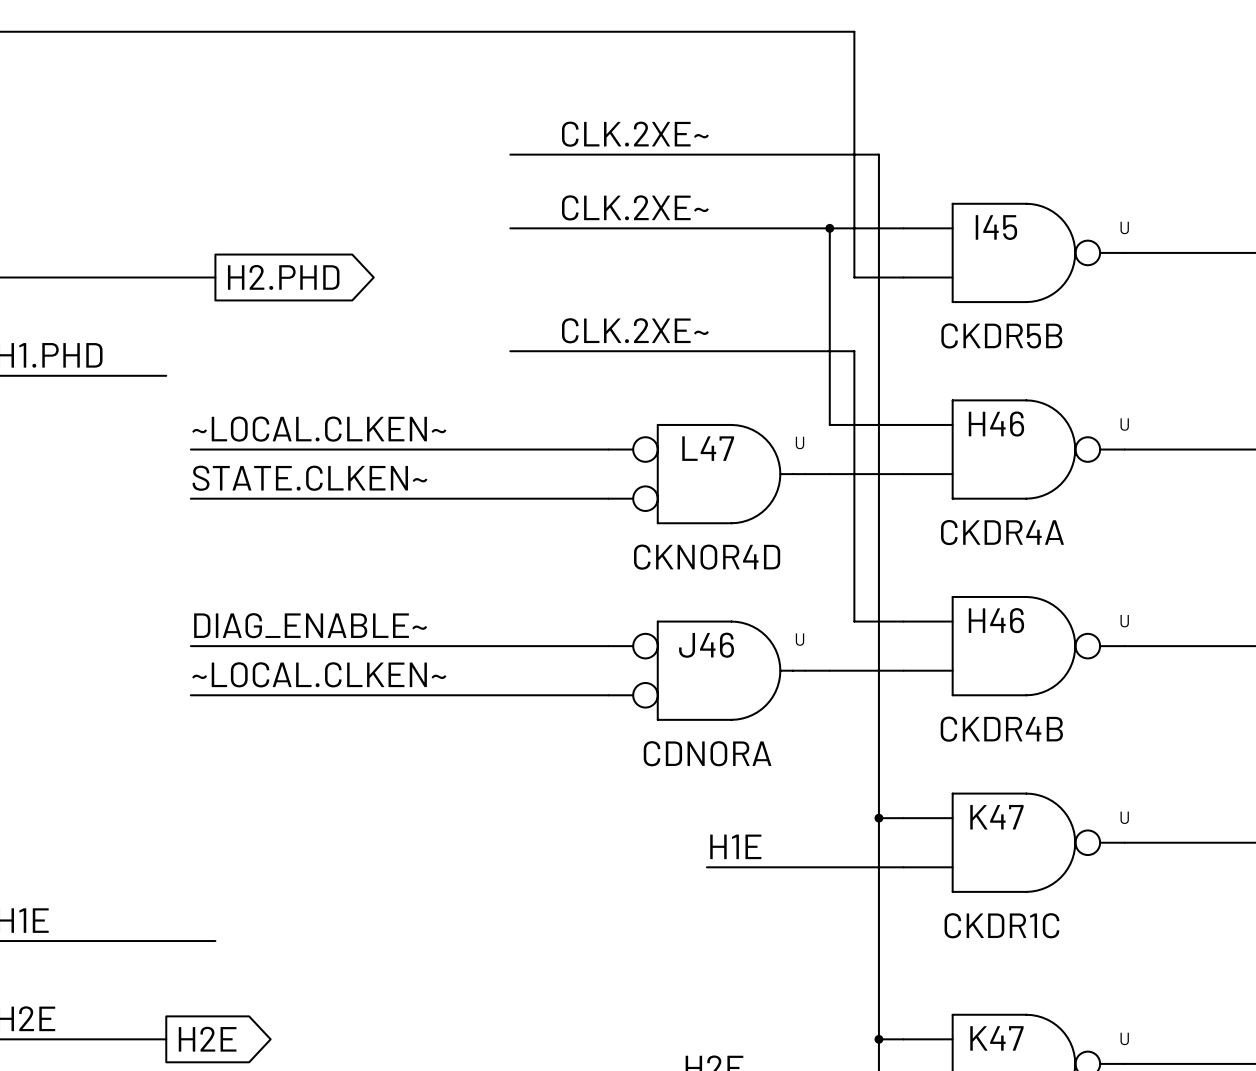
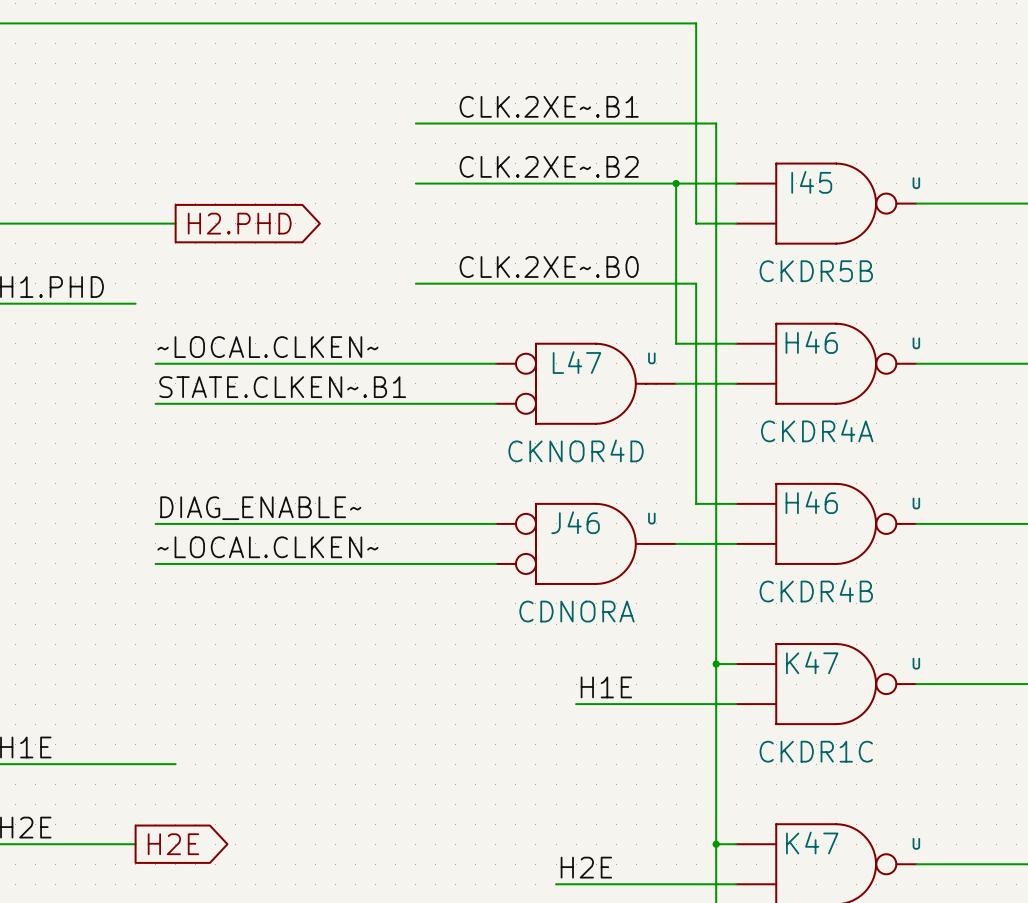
label: CLK.2XE~ (635, 134) -> CLK.2XE~.B1 (549, 106)
label: CLK.2XE~ (635, 207) -> CLK.2XE~.B2 (549, 166)
label: CLK.2XE~ (635, 330) -> CLK.2XE~.B0 (549, 267)
label: STATE.CLKEN~ (310, 478) -> STATE.CLKEN~.B1 (282, 387)

